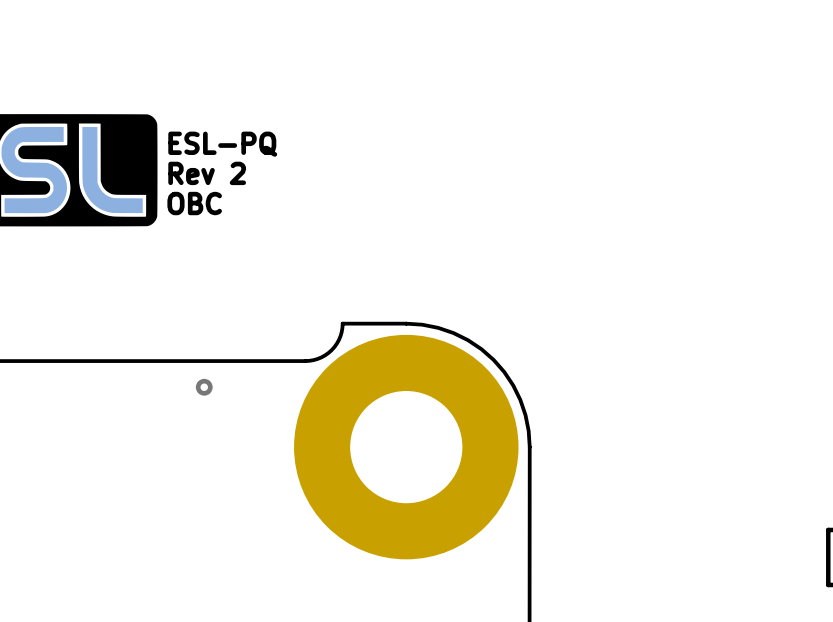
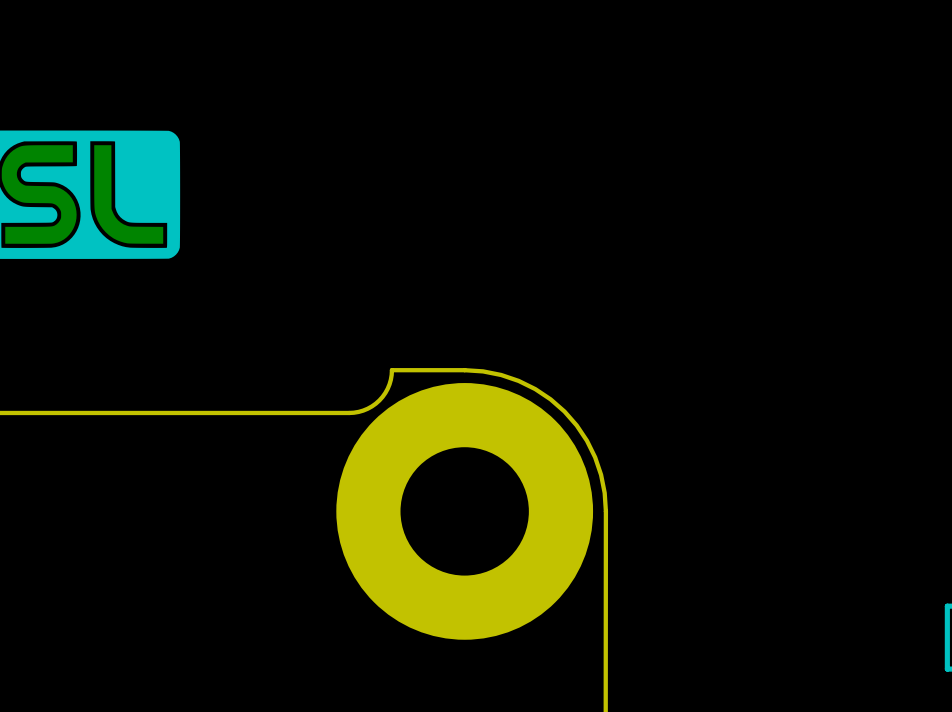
text: ESL-PQ (222, 144) -> none
text: Rev 2 (207, 173) -> none
text: OBC (194, 203) -> none
via: (204, 387) -> none

